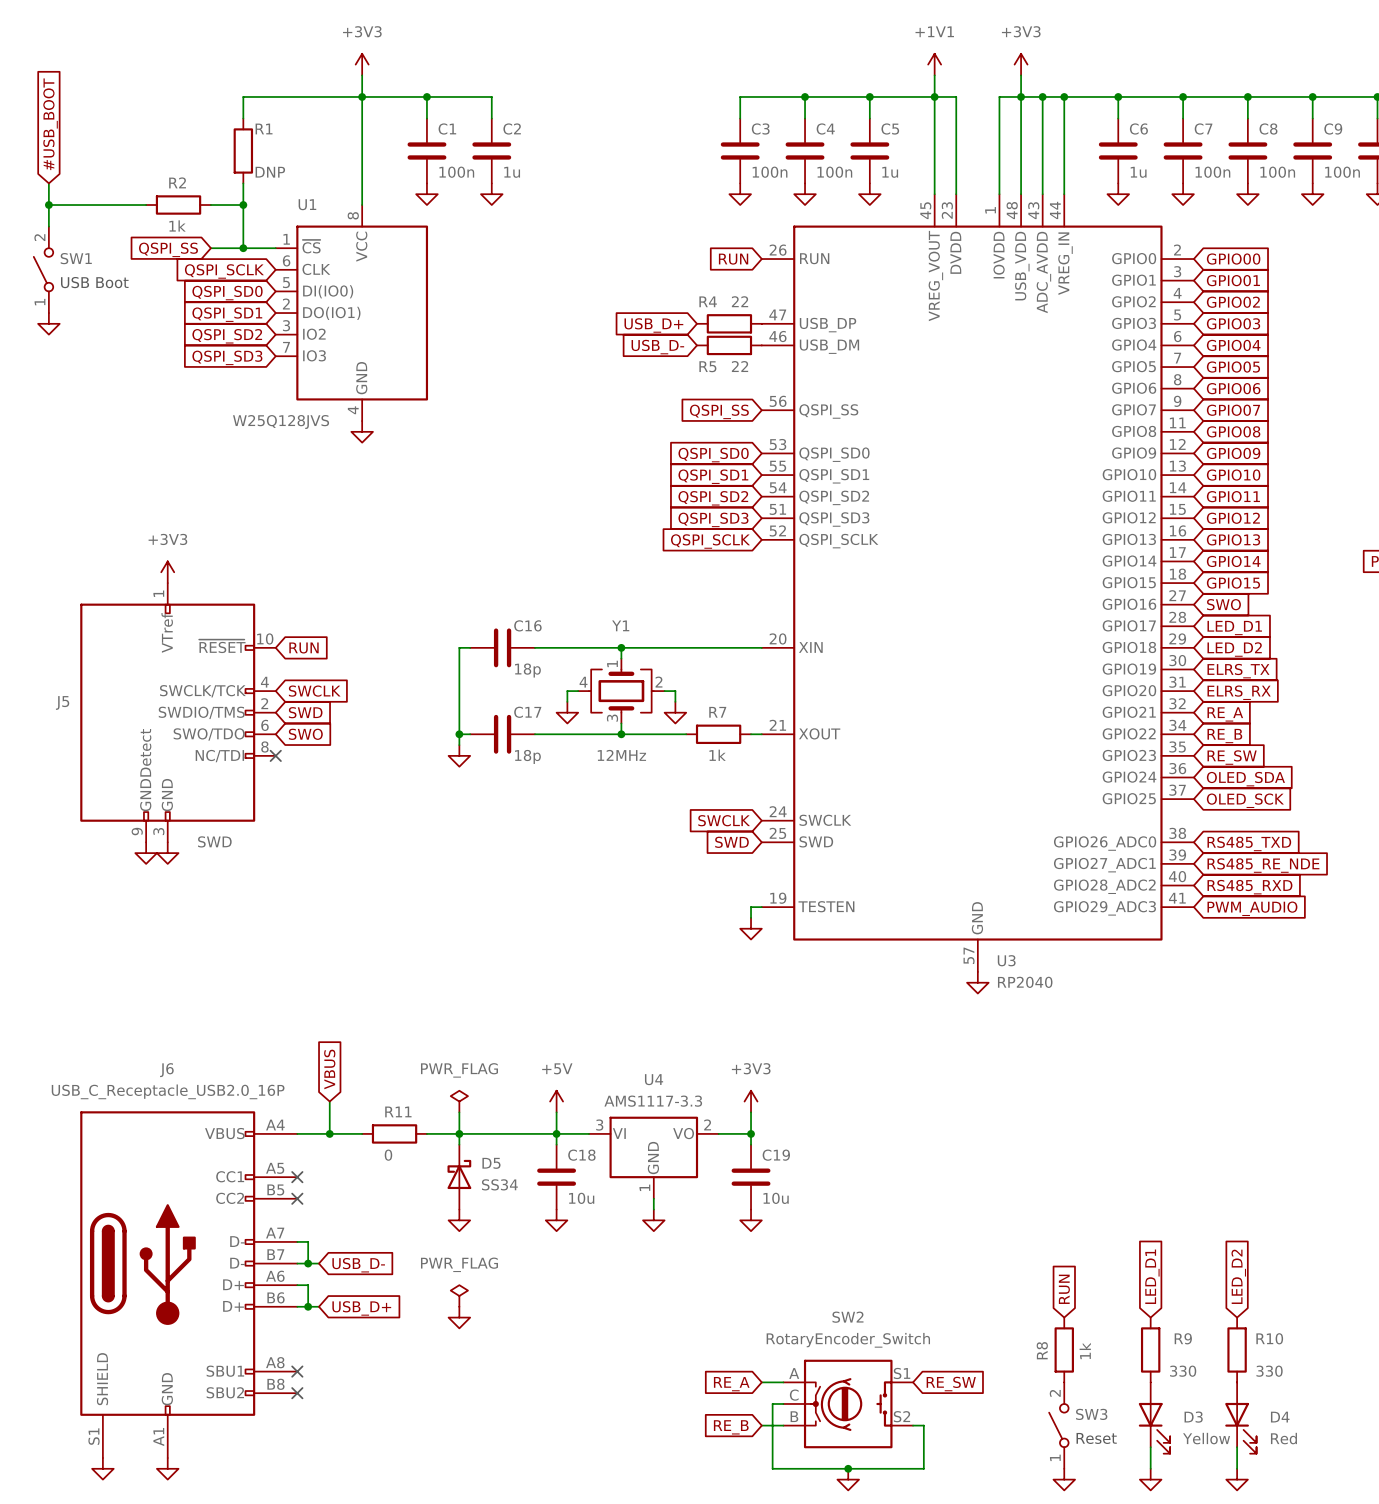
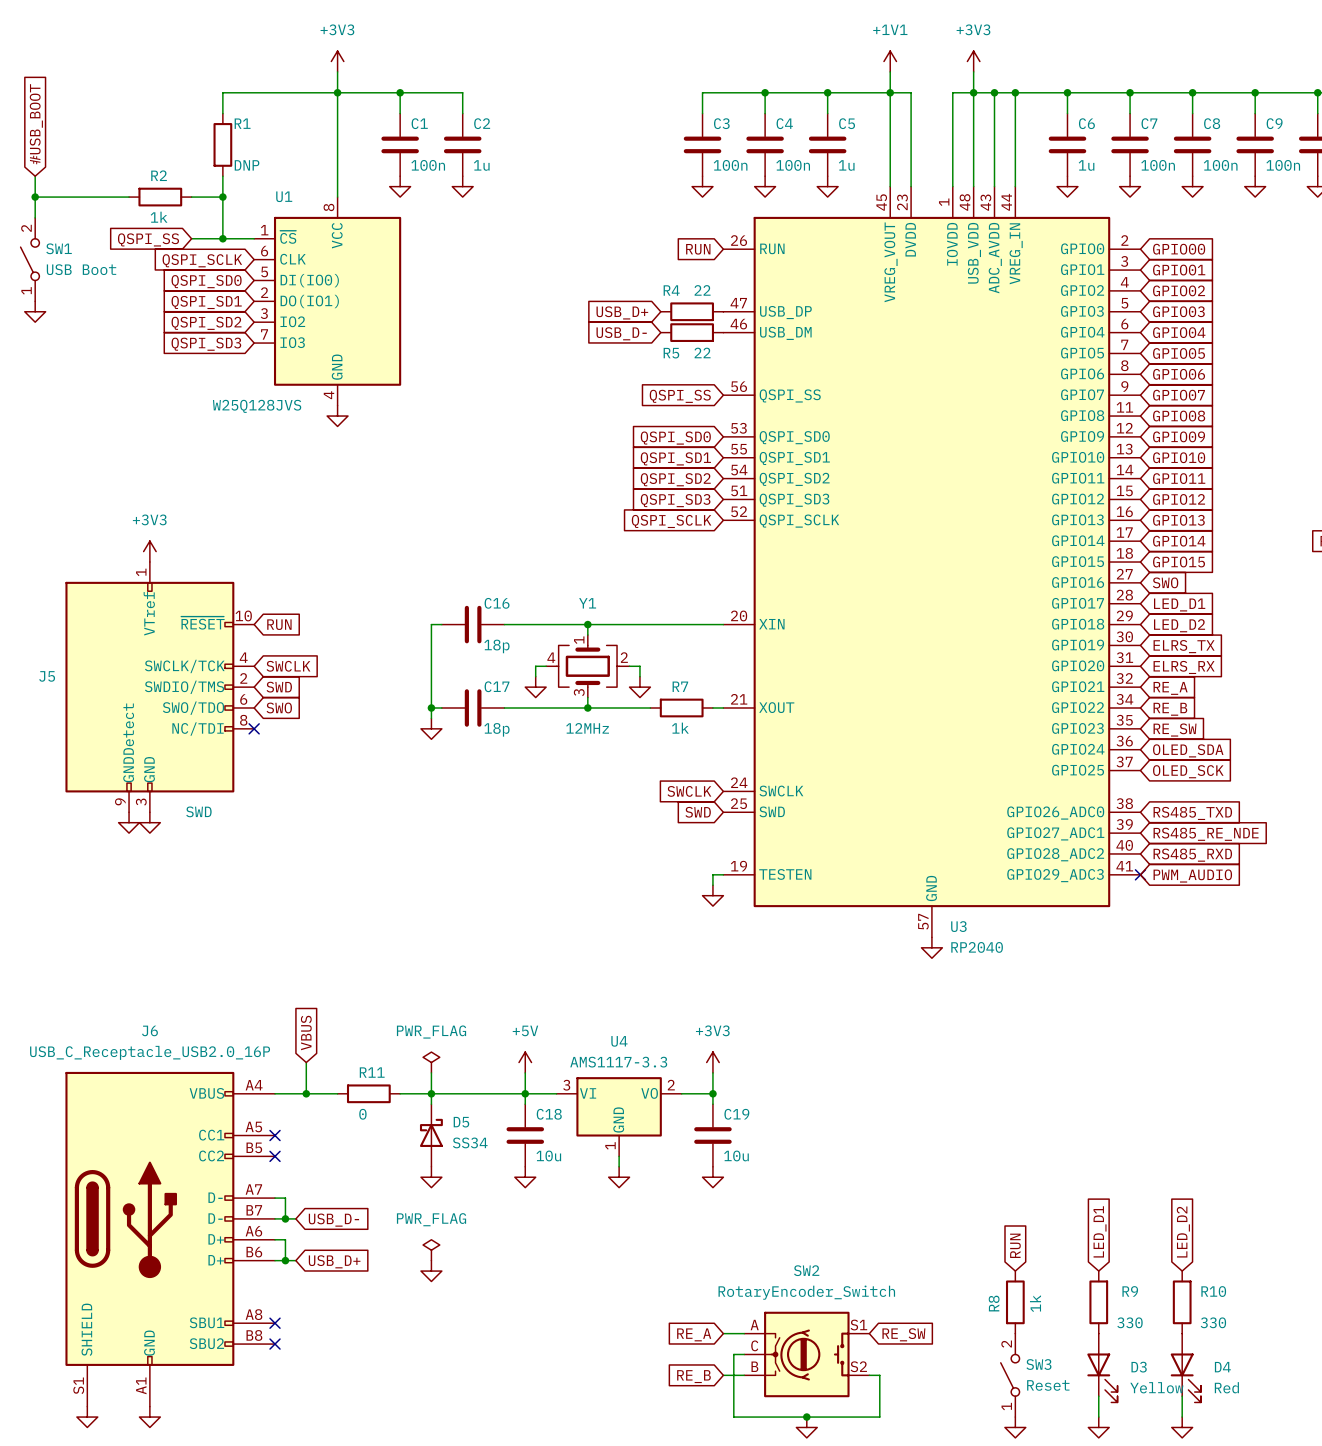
SW1 value: none -> USB Boot (81, 269)
text: USB Boot (94, 282) -> none
no-connect mark: none -> (1140, 874)
SW3 value: none -> Reset (1048, 1385)
text: Reset (1096, 1438) -> none

